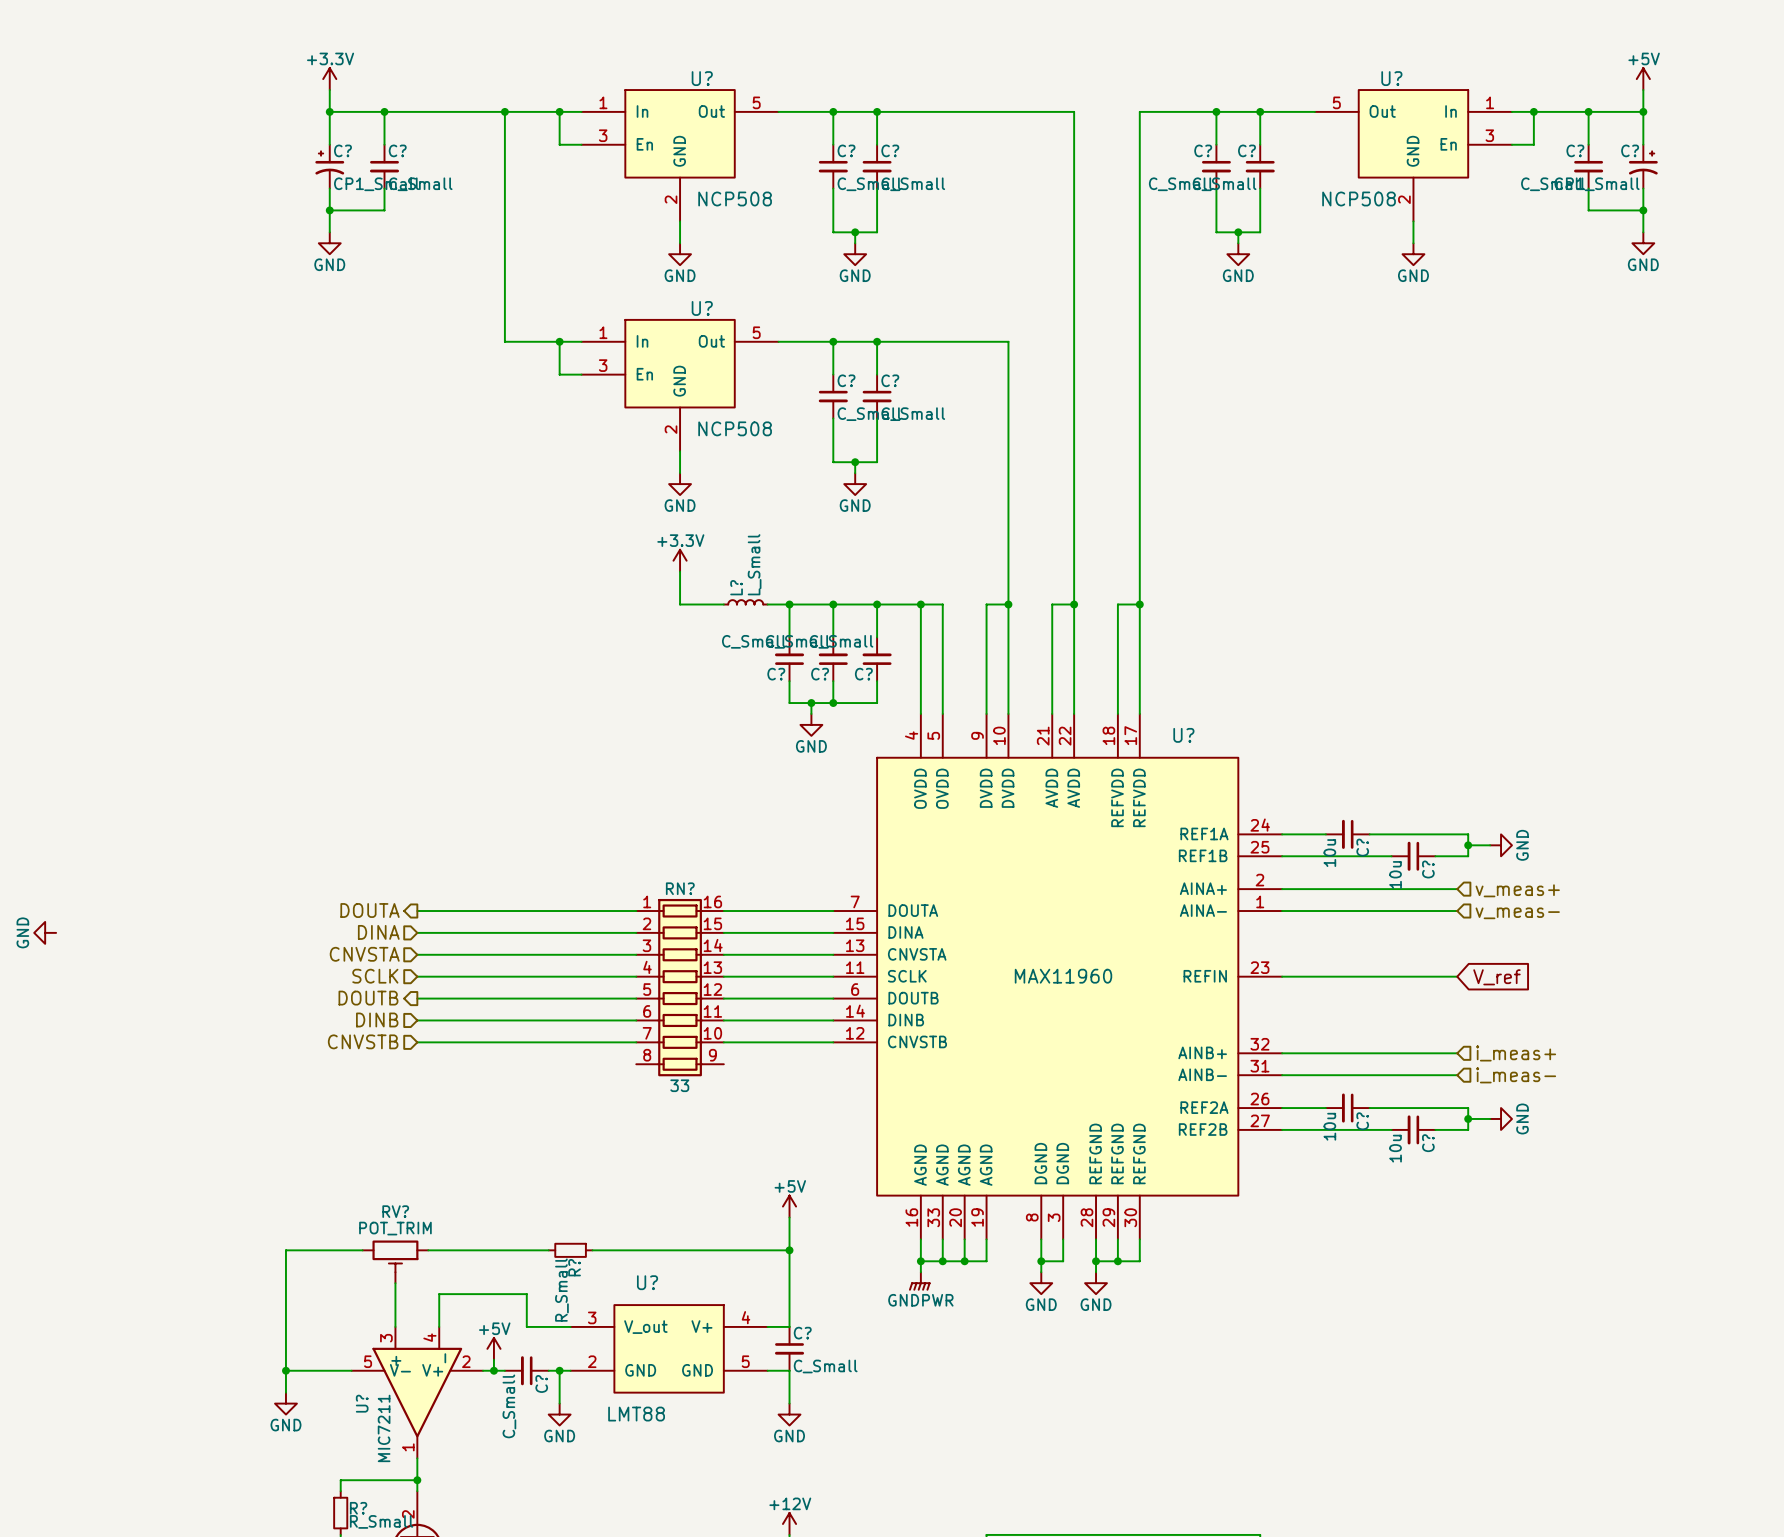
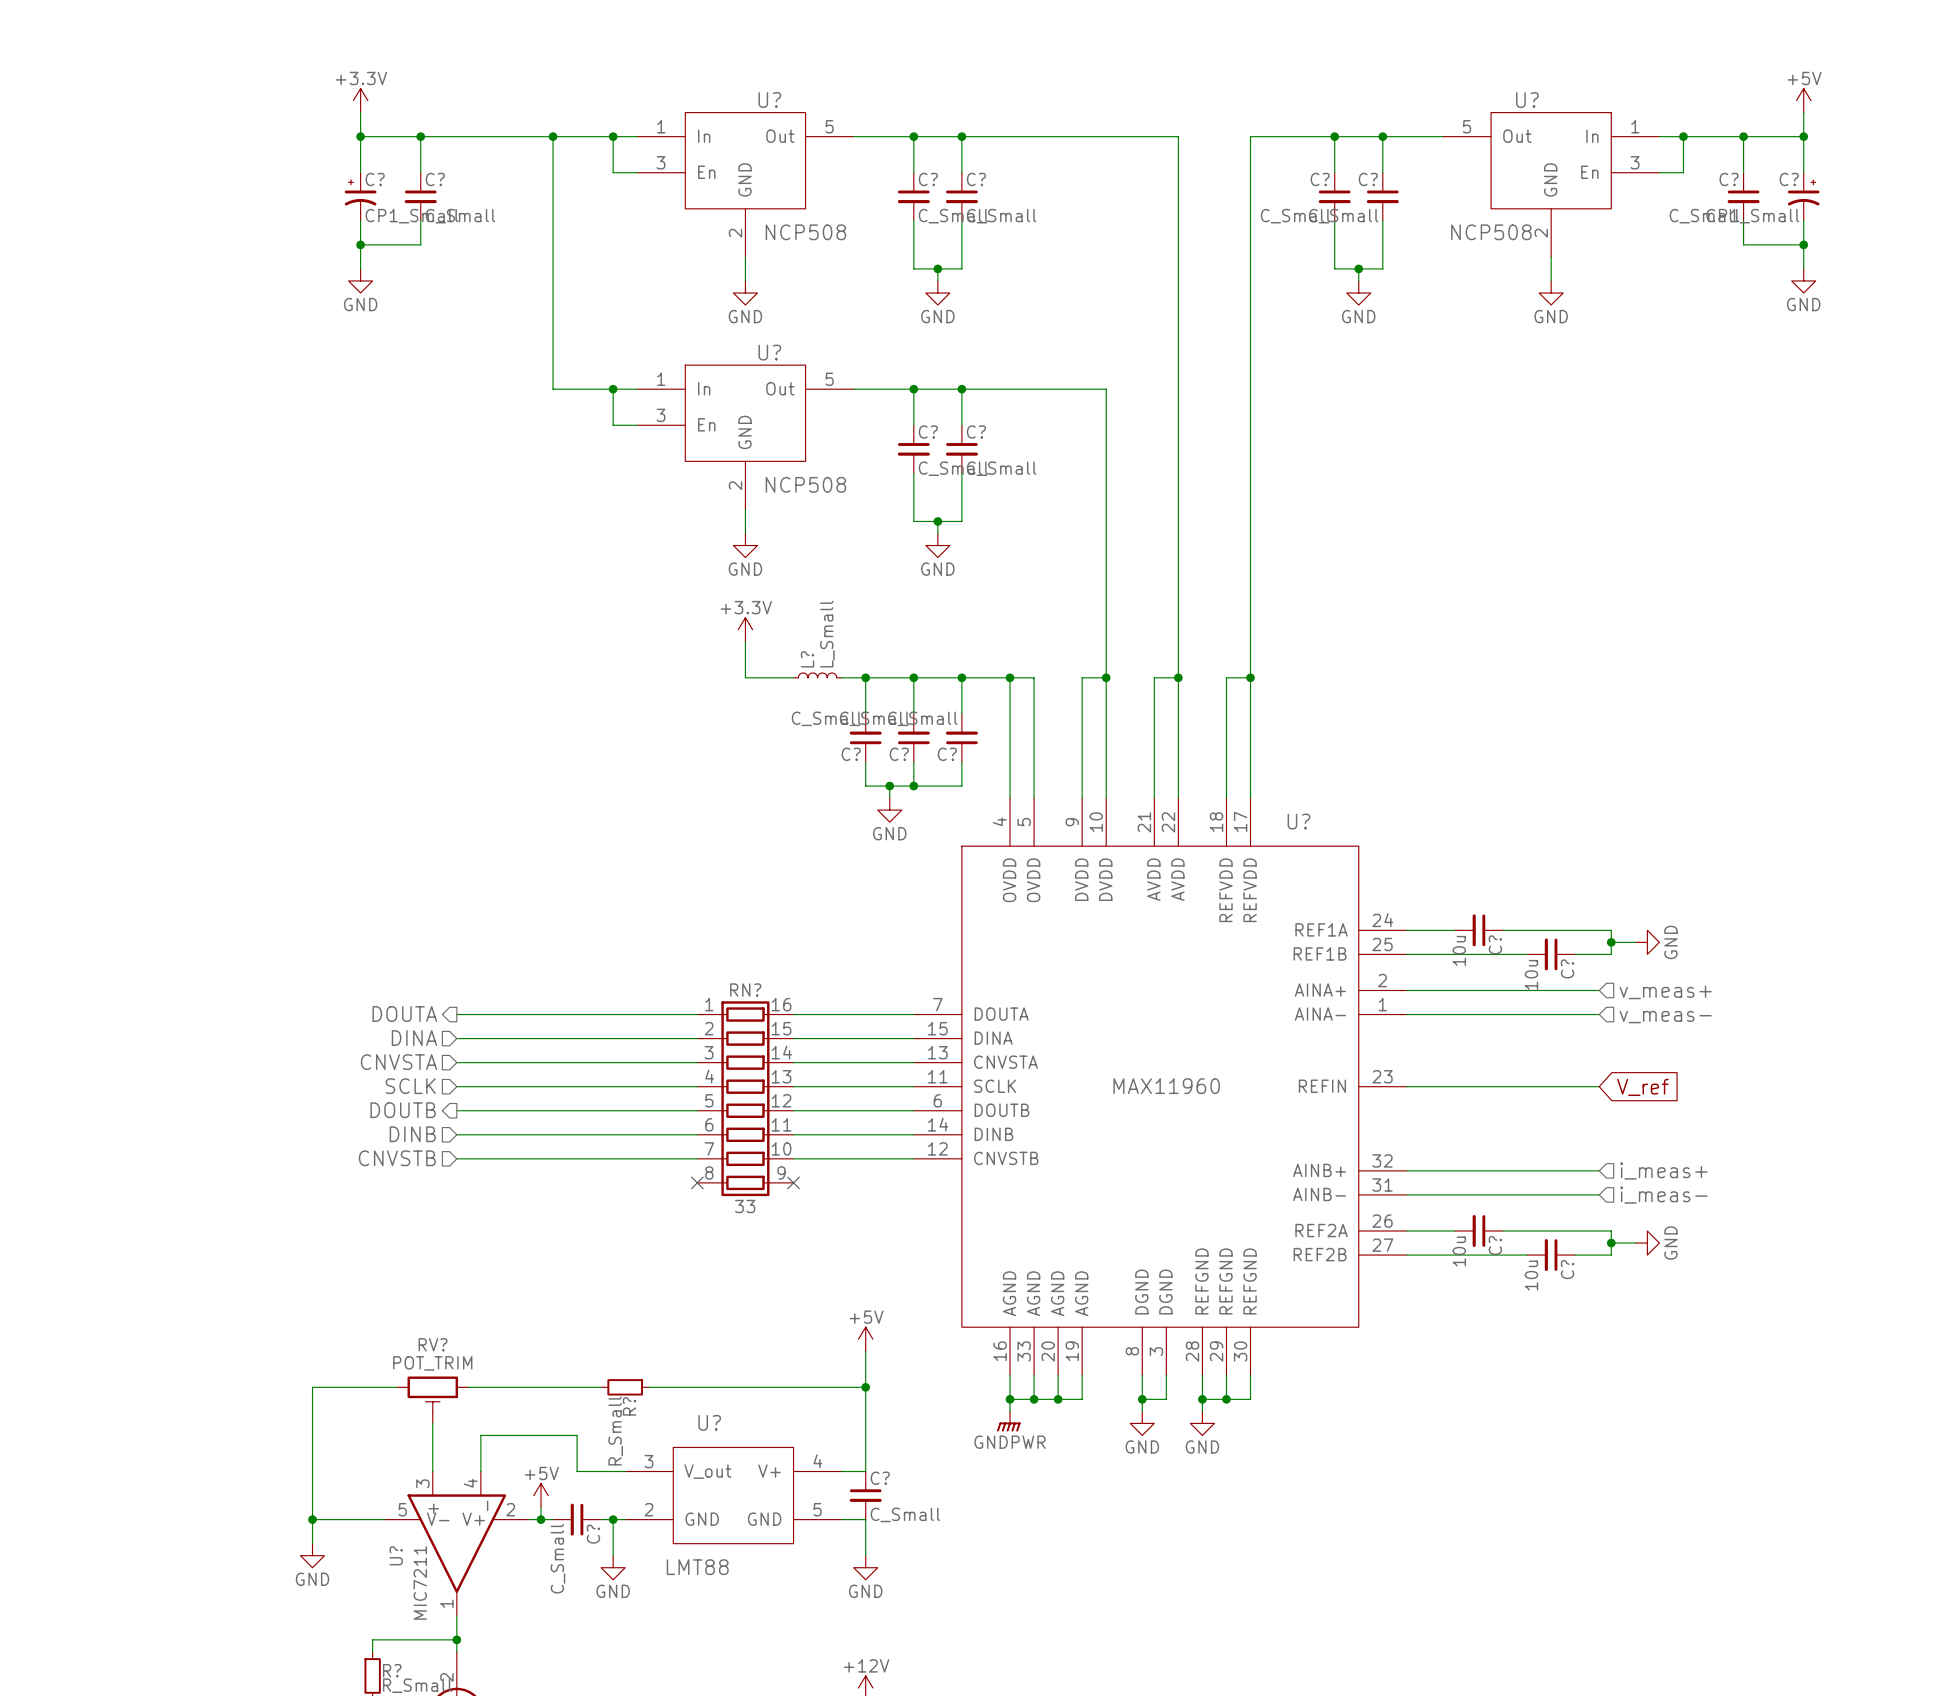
power symbol: GND (45, 932) -> none
no-connect mark: none -> (697, 1182)
no-connect mark: none -> (793, 1182)

